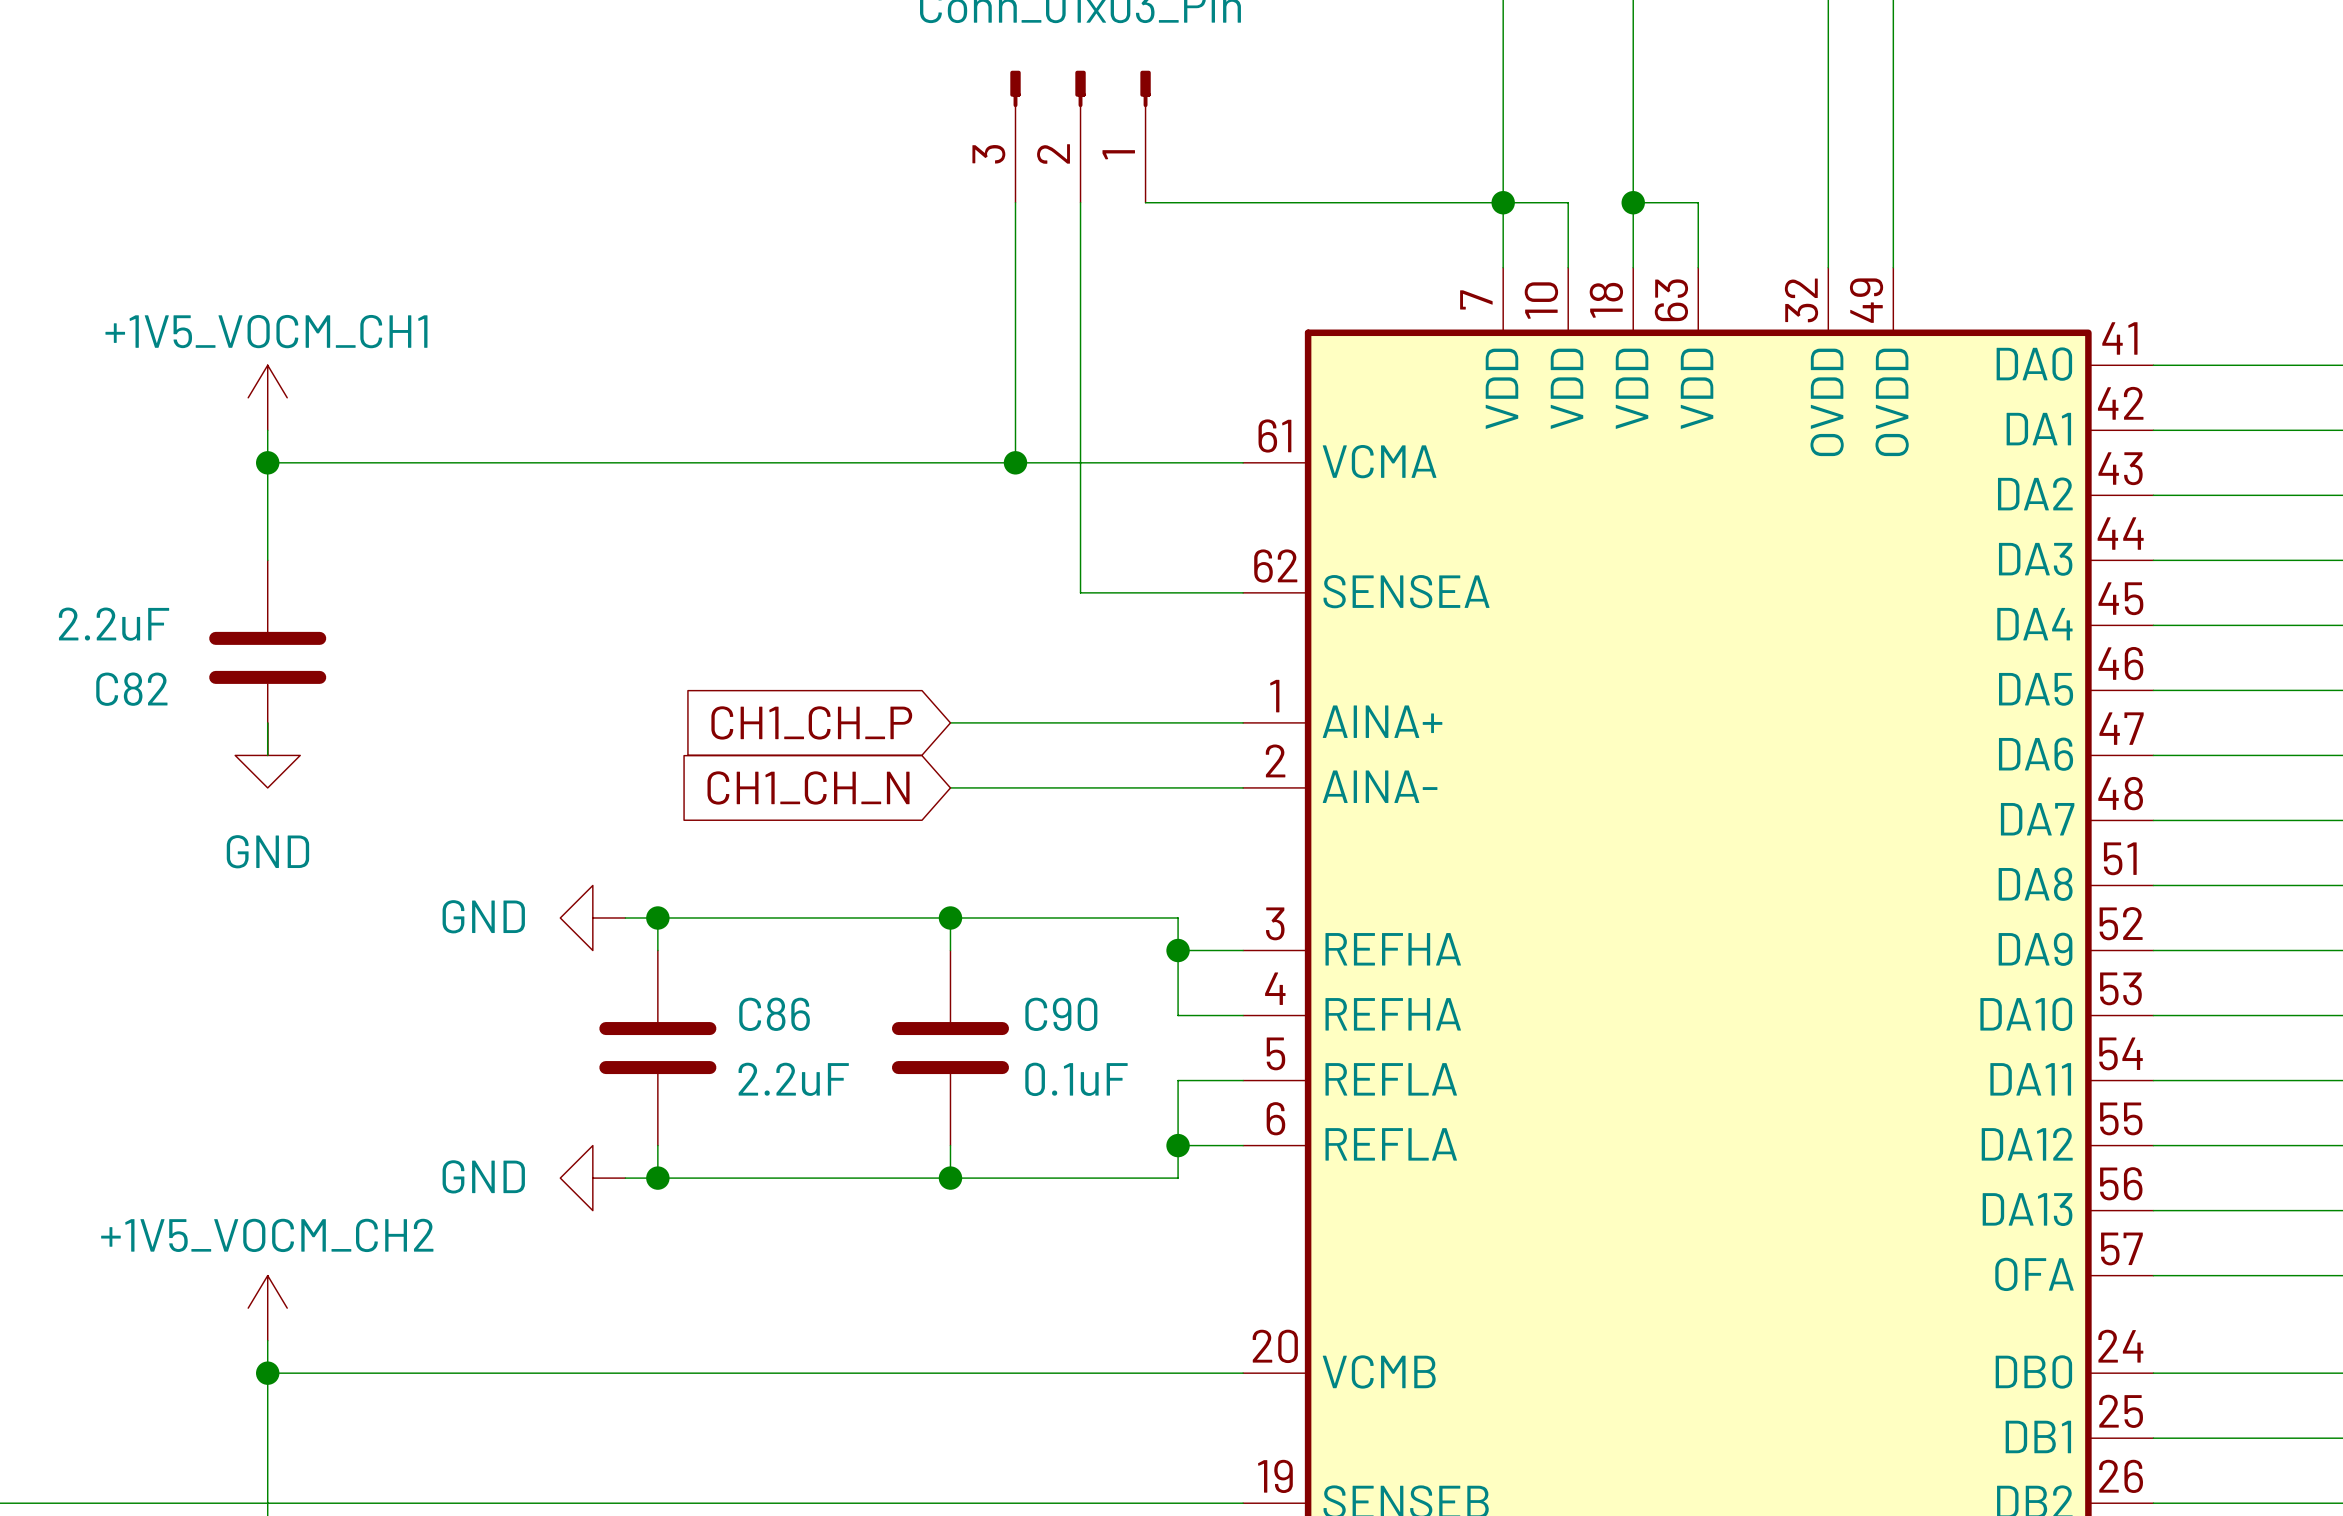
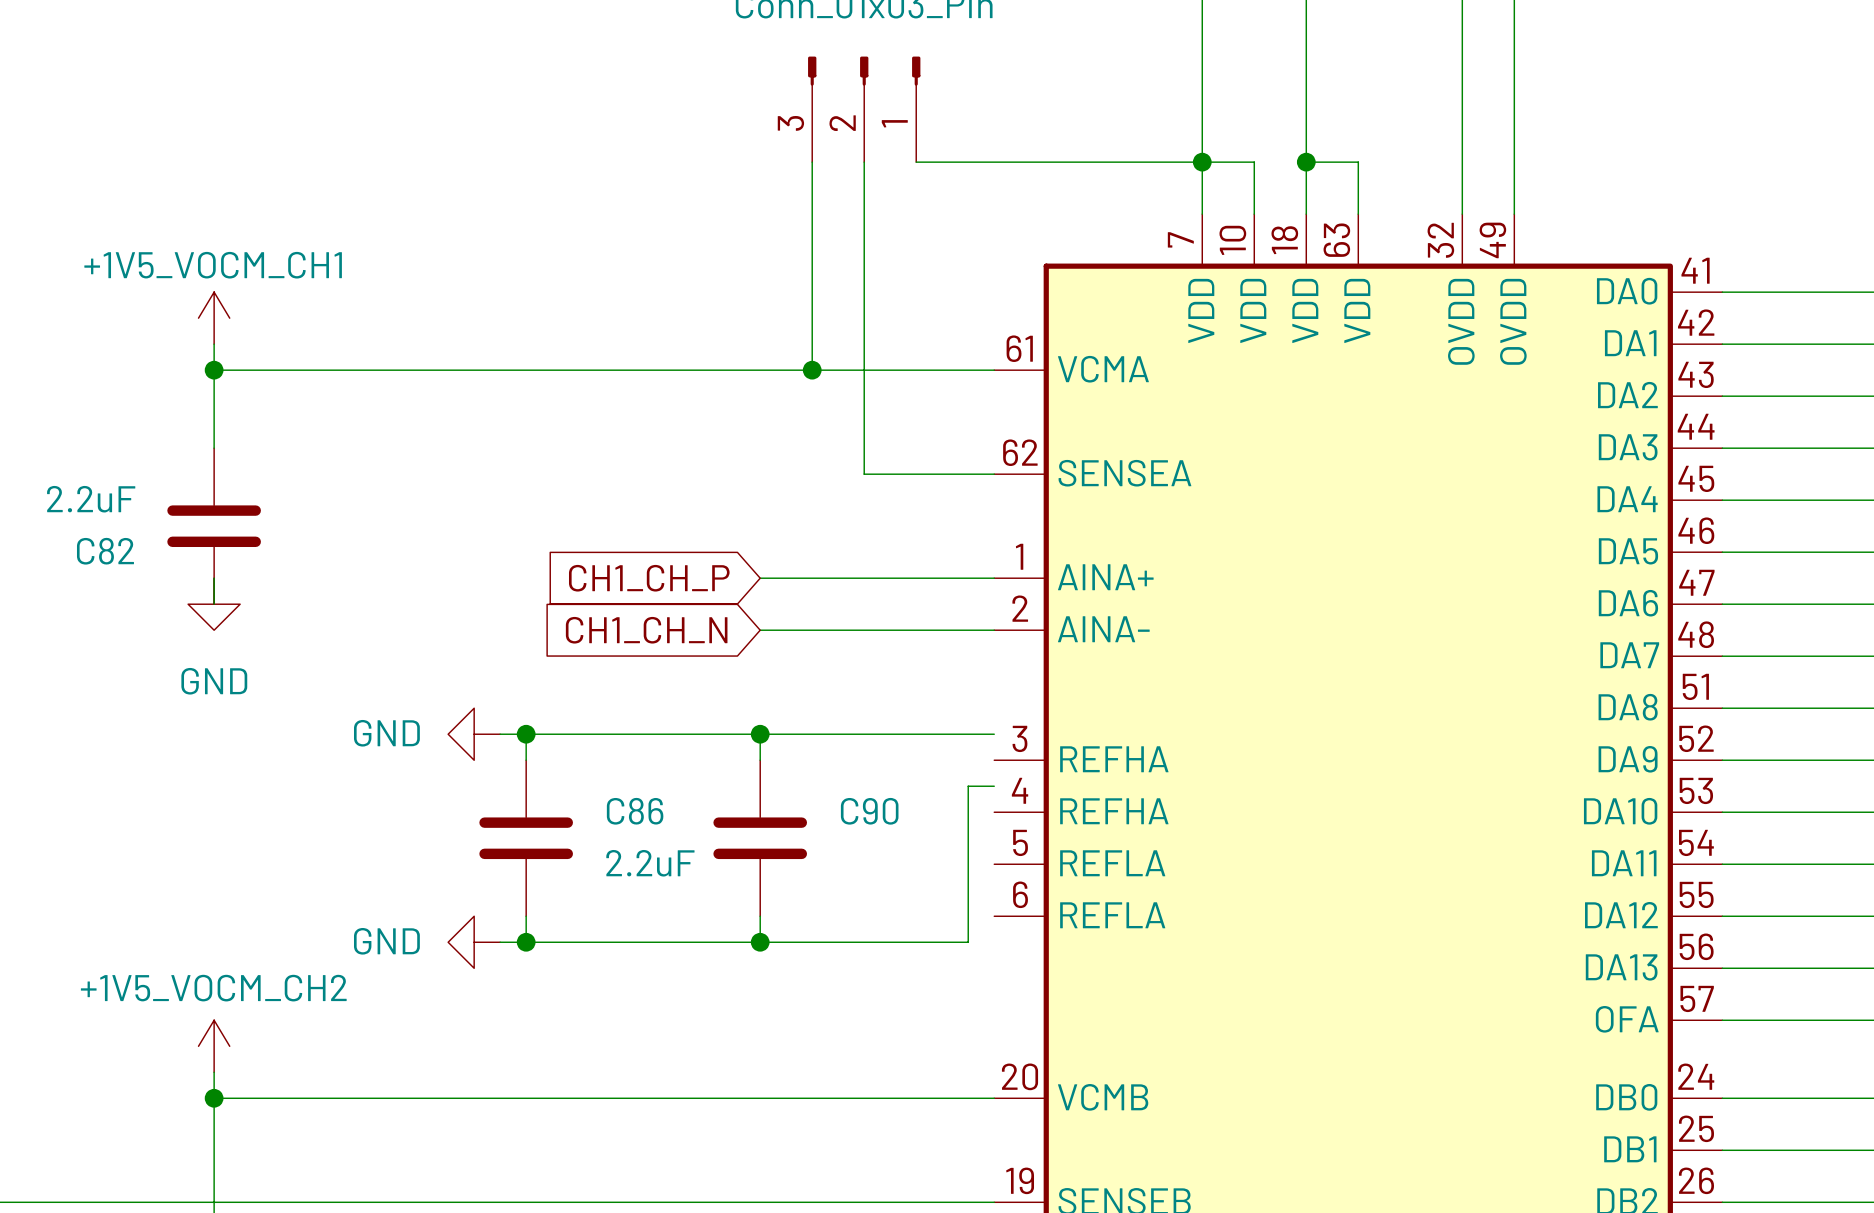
wire: (1178, 917) (1178, 1015) (1243, 1015) -> (942, 734) (994, 734)
wire: (1178, 950) (1243, 950) -> none
junction: (1178, 950) -> none
C86 name position: C86 (774, 1014) -> C86 (635, 811)
C90 name position: C90 (1061, 1014) -> C90 (869, 811)
C86 value position: 2.2uF (793, 1079) -> 2.2uF (650, 863)
C90 value: 0.1uF (1076, 1079) -> none
wire: (1243, 1080) (1178, 1080) (1178, 1178) -> (994, 786) (968, 786) (968, 942) (942, 942)
wire: (1178, 1145) (1243, 1145) -> none
junction: (1178, 1145) -> none

